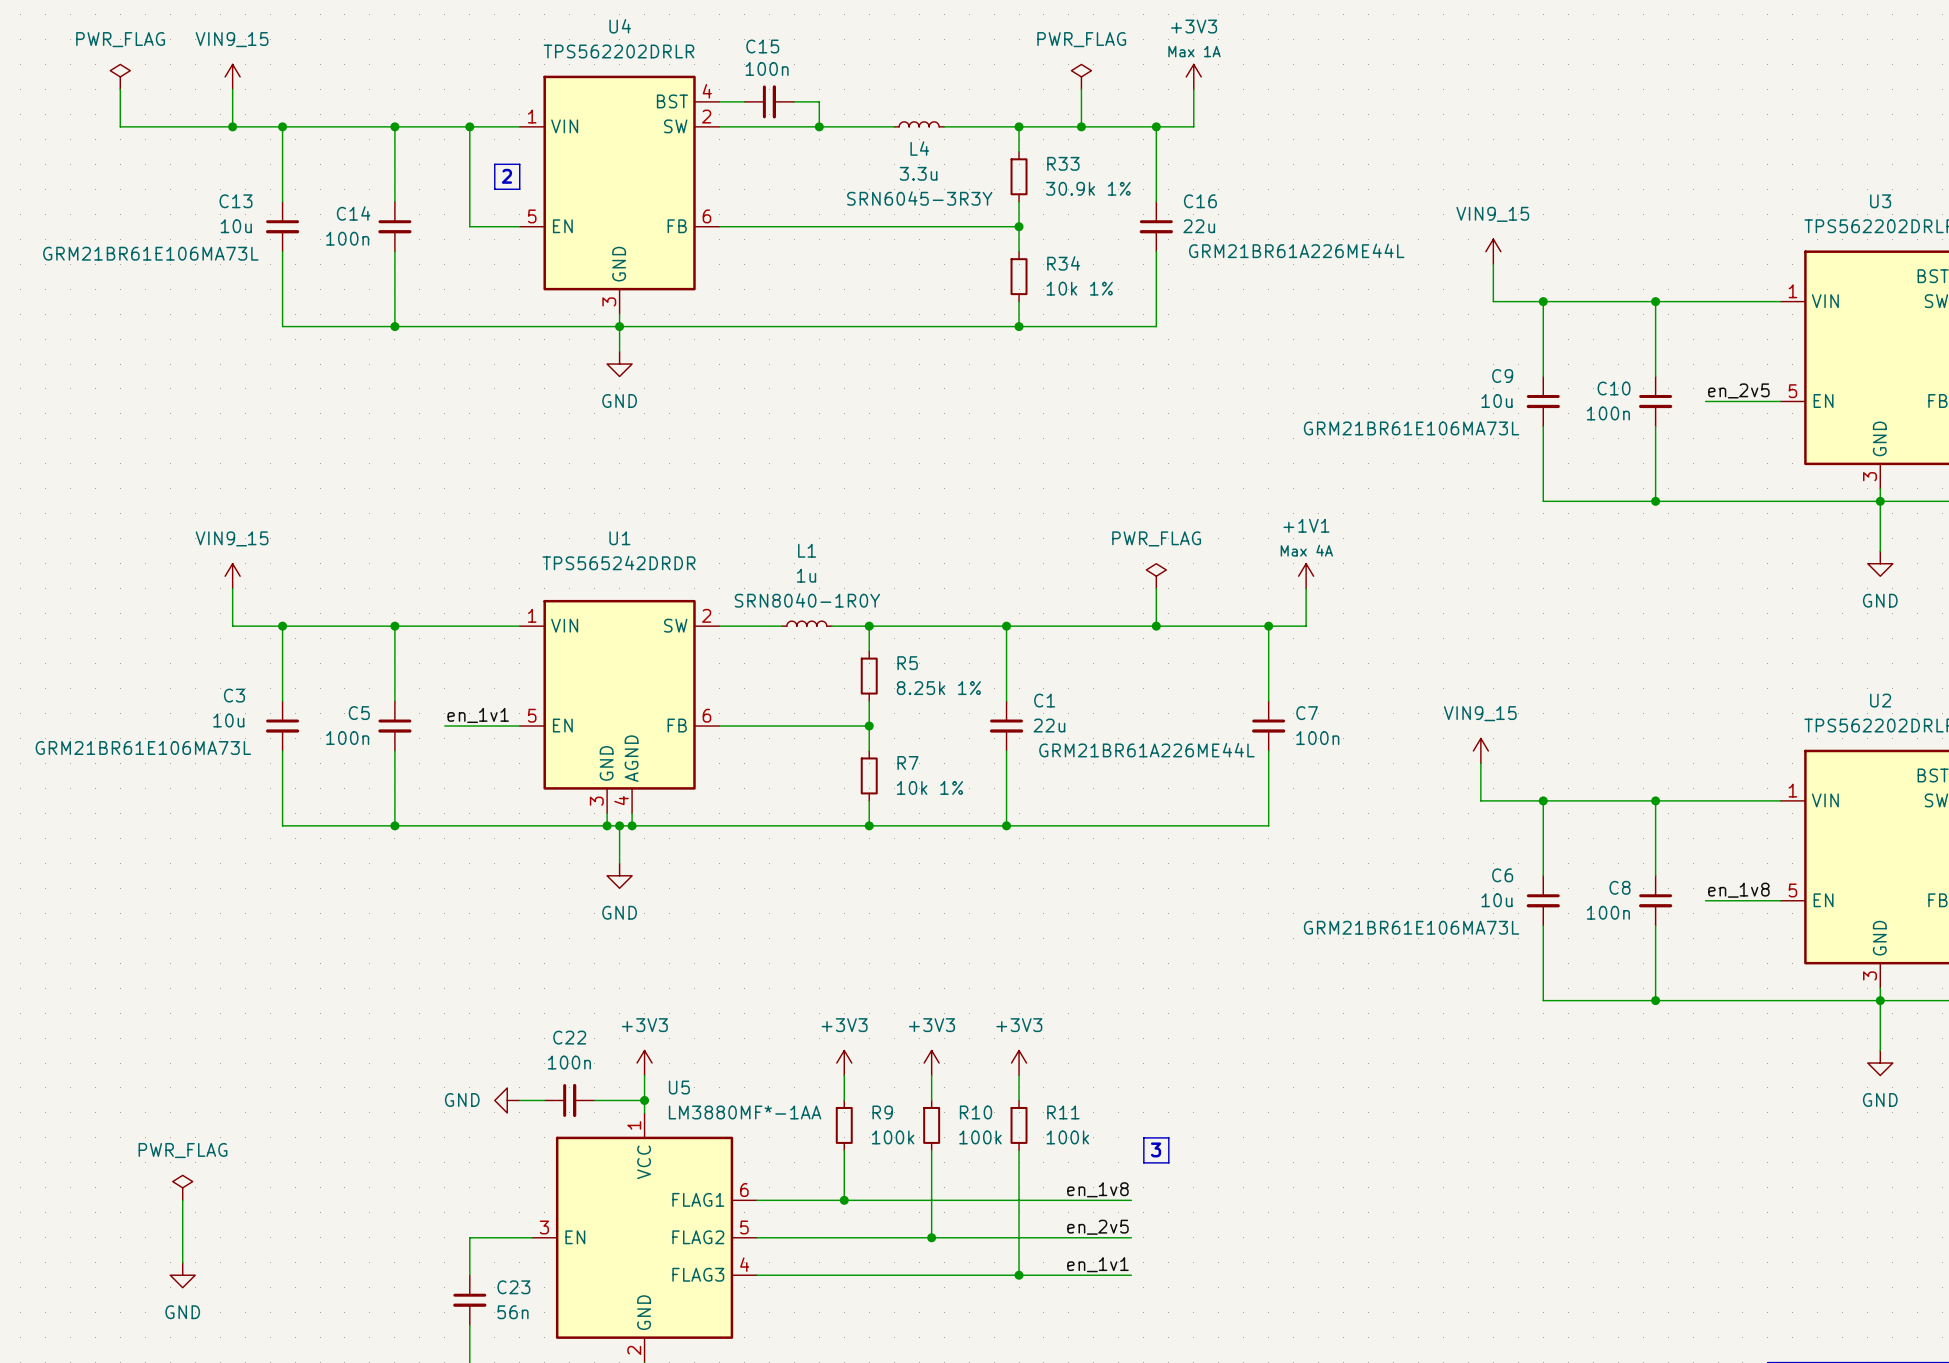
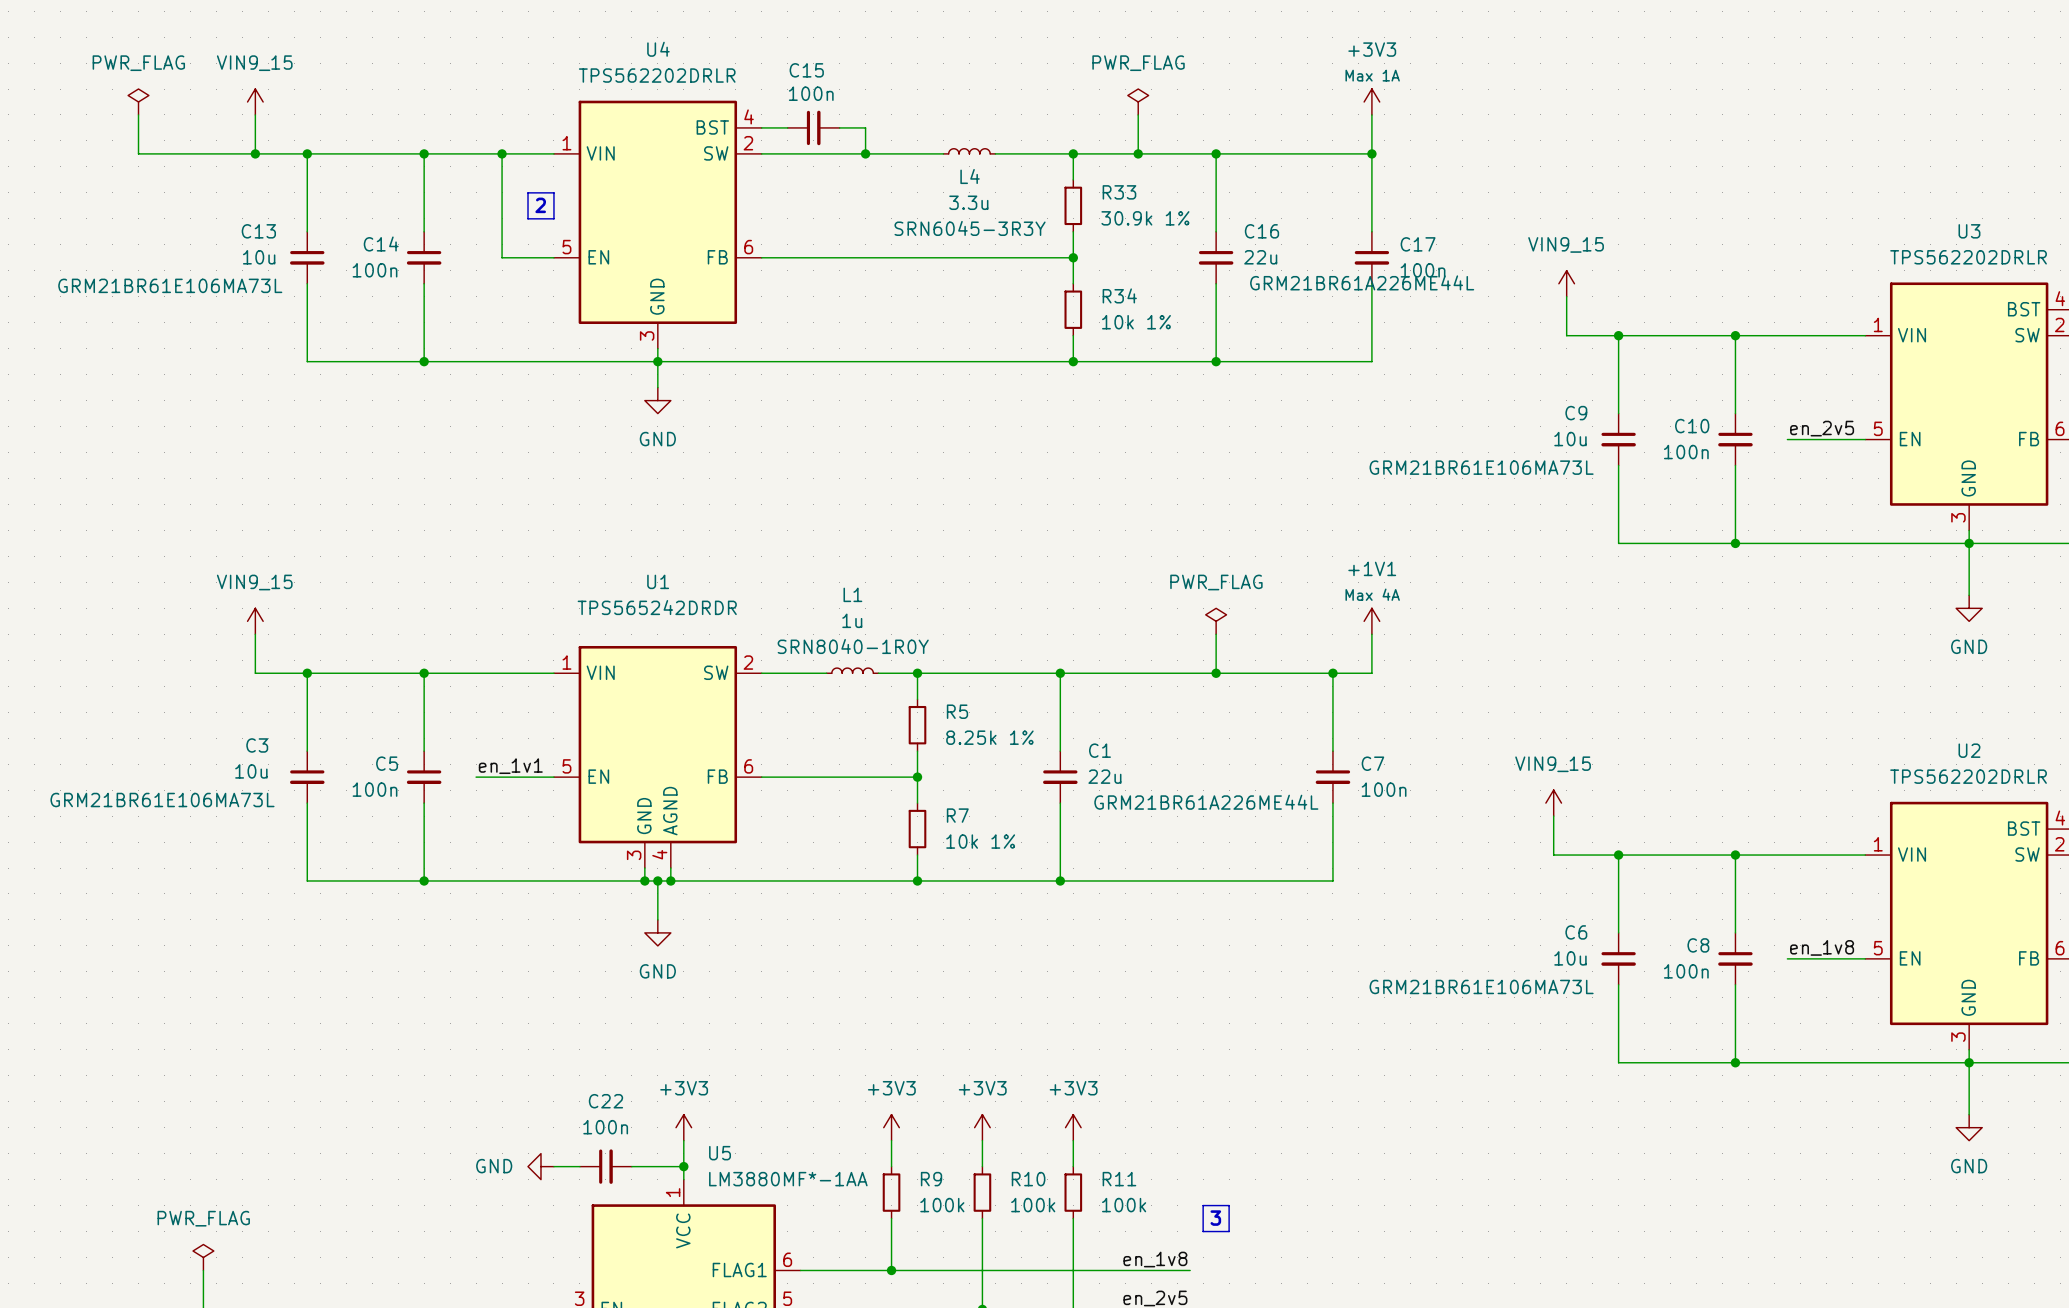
power symbol position: +3V3 (1193, 76) -> +3V3 (1371, 101)
wire: (1193, 89) (1193, 126) -> (1371, 153) (1255, 153)
wire: none -> (1371, 114) (1371, 231)
junction: none -> (1371, 153)
C17: none -> 100n (1371, 257)
wire: none -> (1371, 283) (1371, 361) (1216, 361)
junction: none -> (1216, 361)

